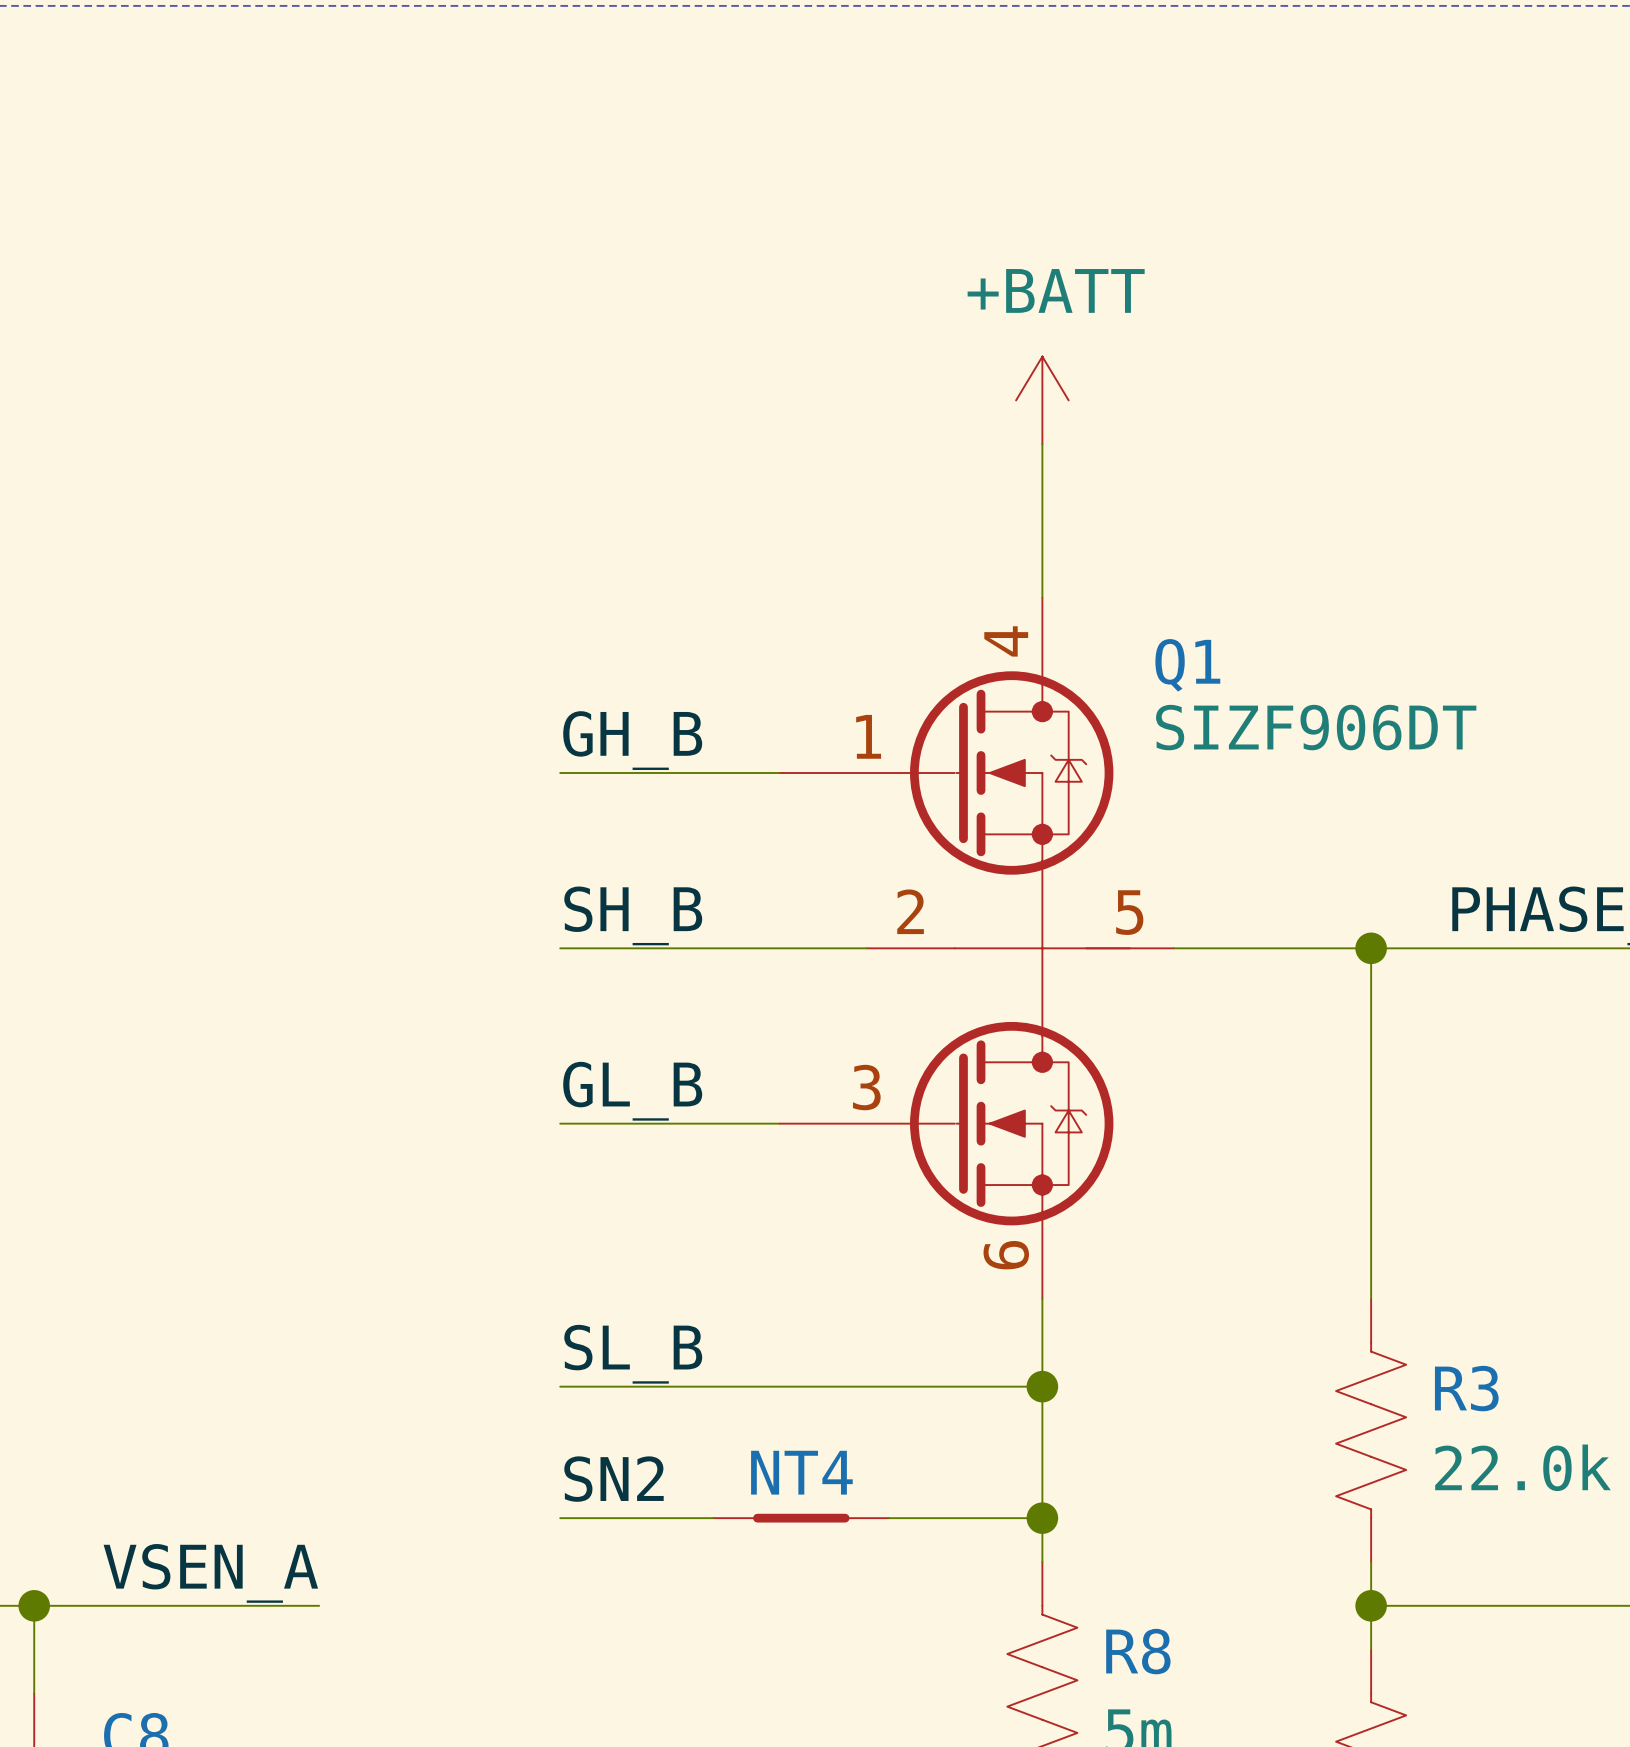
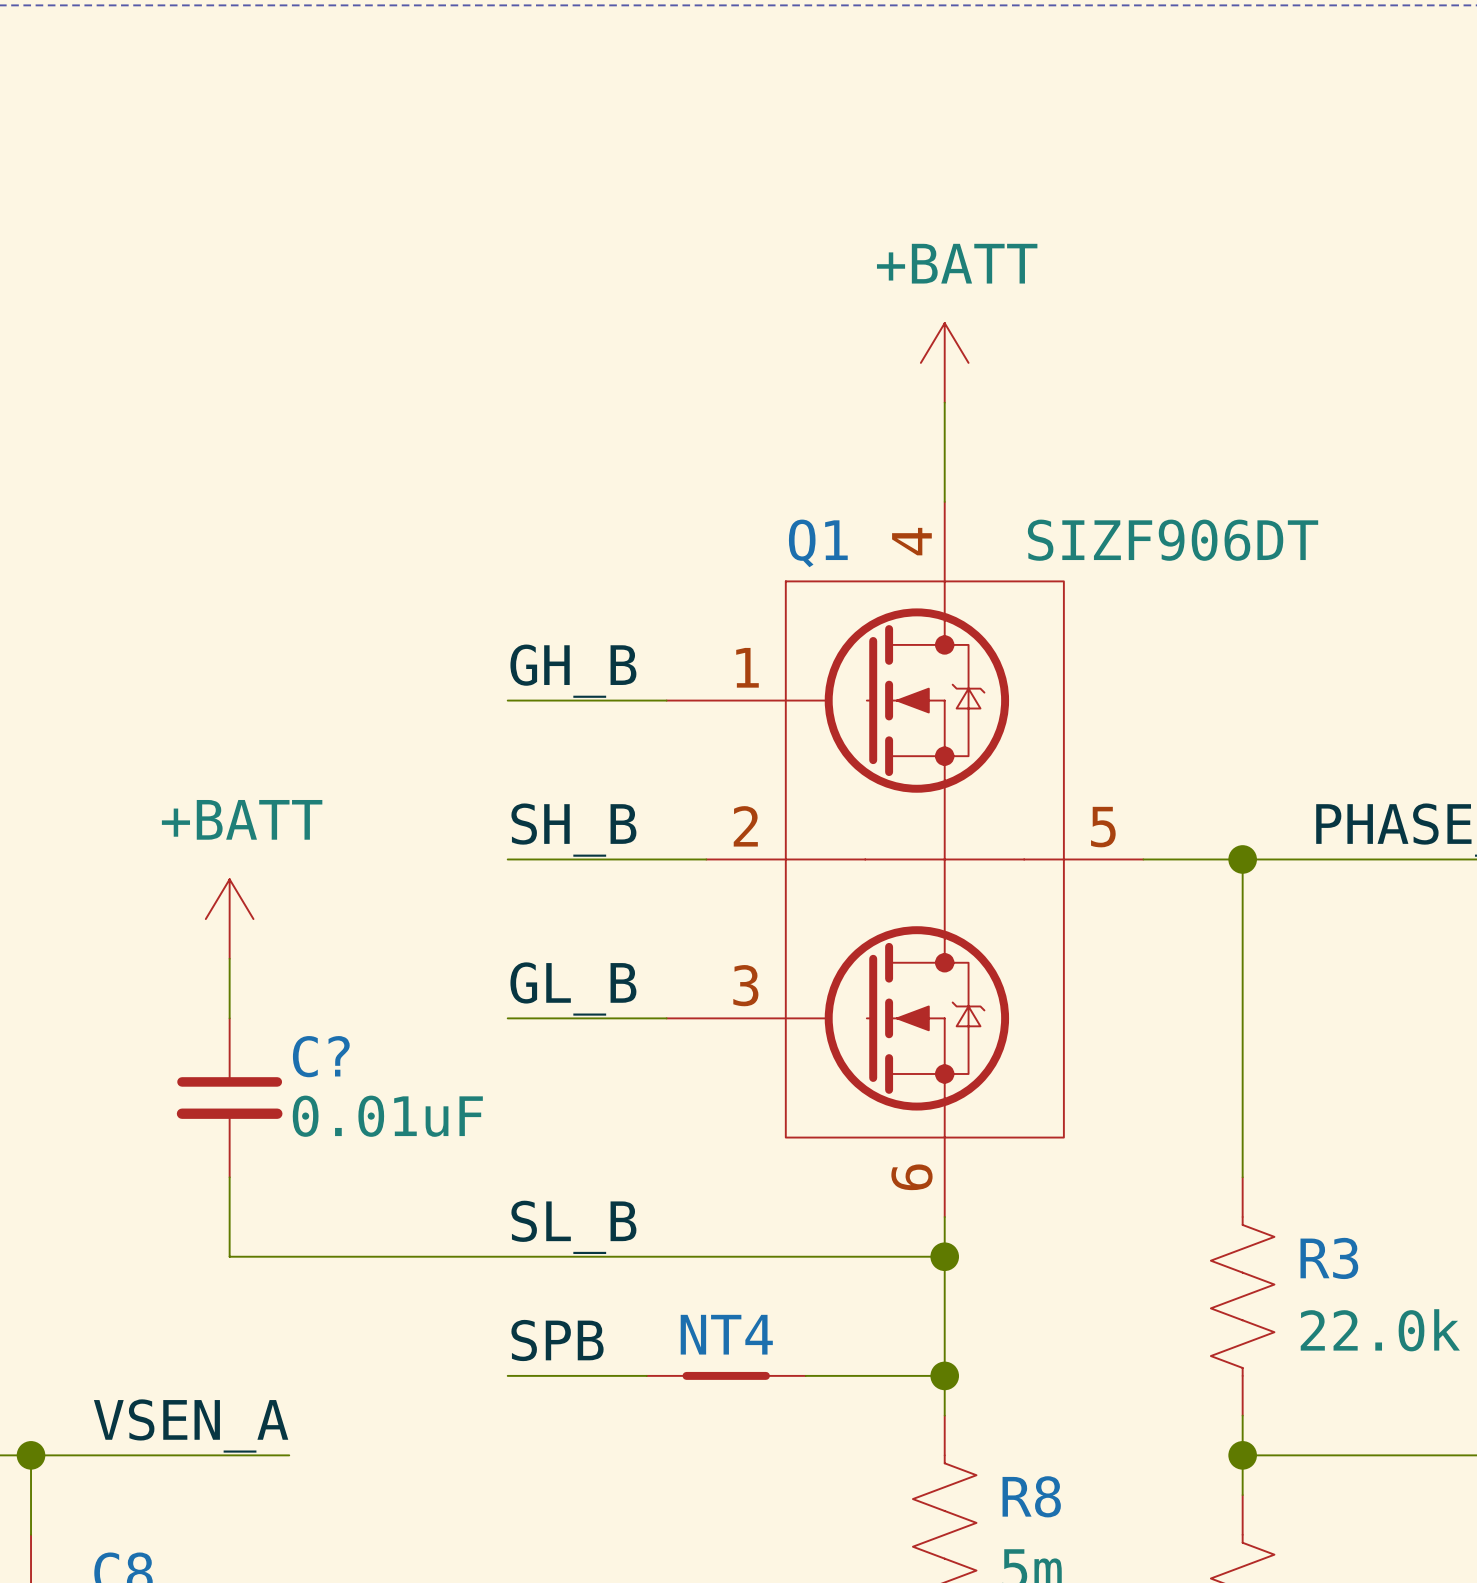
Q1 symbol: [779, 597, 1174, 1299] -> [666, 501, 1144, 1218]
Q1 name position: Q1 (1187, 665) -> Q1 (818, 543)
Q1 value position: SIZF906DT (1316, 727) -> SIZF906DT (1173, 540)
power symbol: none -> +BATT (229, 919)
wire: none -> (229, 958) (229, 1018)
C?: none -> 0.01uF (229, 1097)
wire: none -> (229, 1177) (229, 1256) (507, 1256)
label: SN2 (614, 1479) -> SPB (557, 1340)

